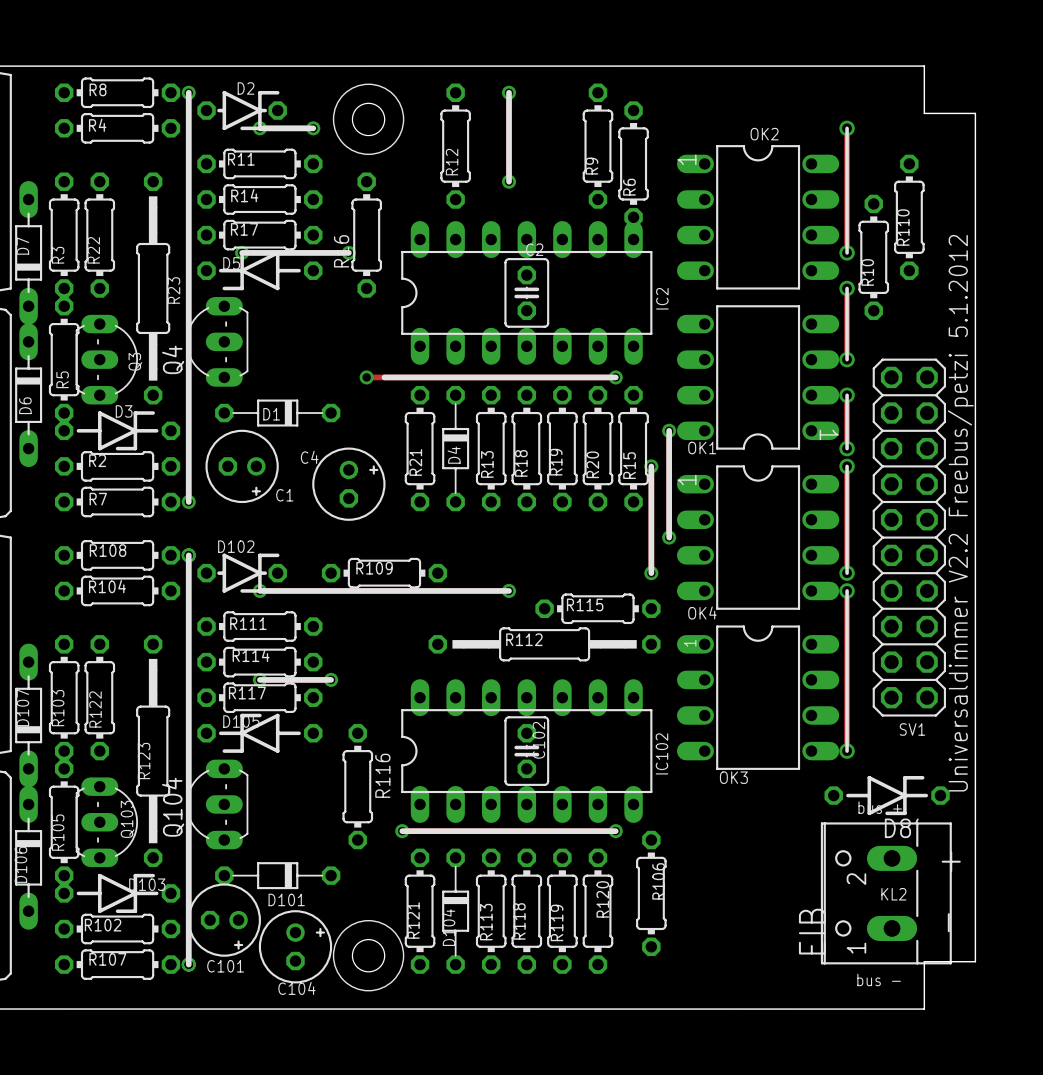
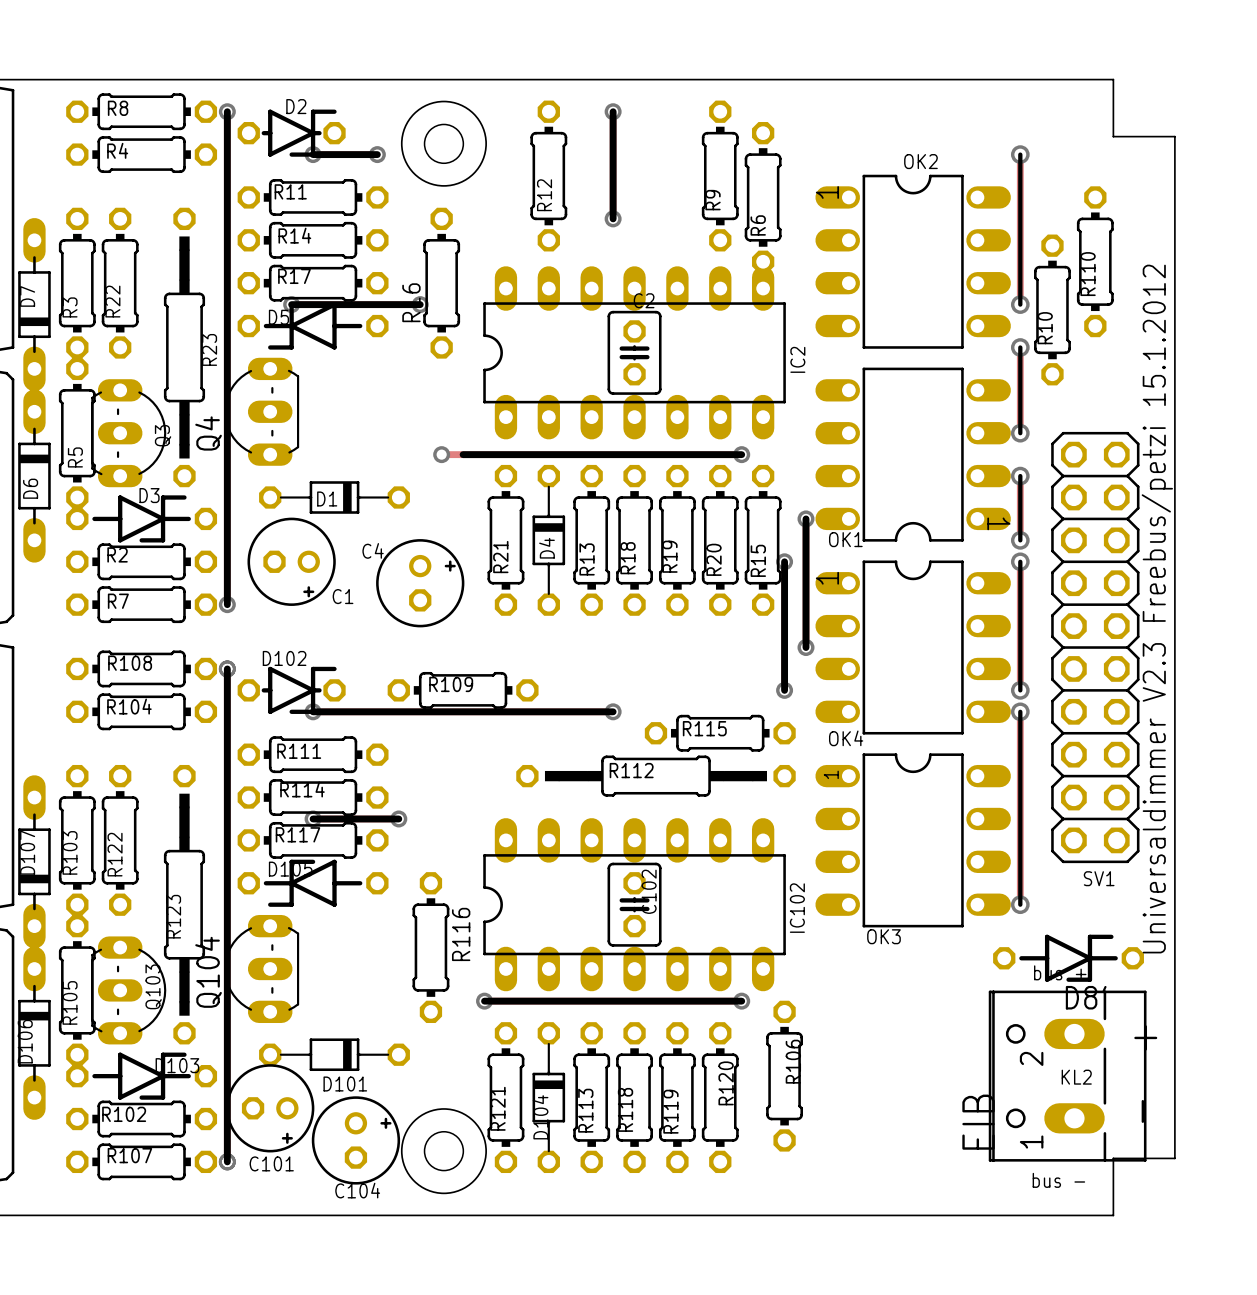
text: Universaldimmer V2.2 Freebus/petzi 5.1.2012 (960, 513) -> Universaldimmer V2.3 Freebus/petzi 15.1.2012 (1157, 609)

